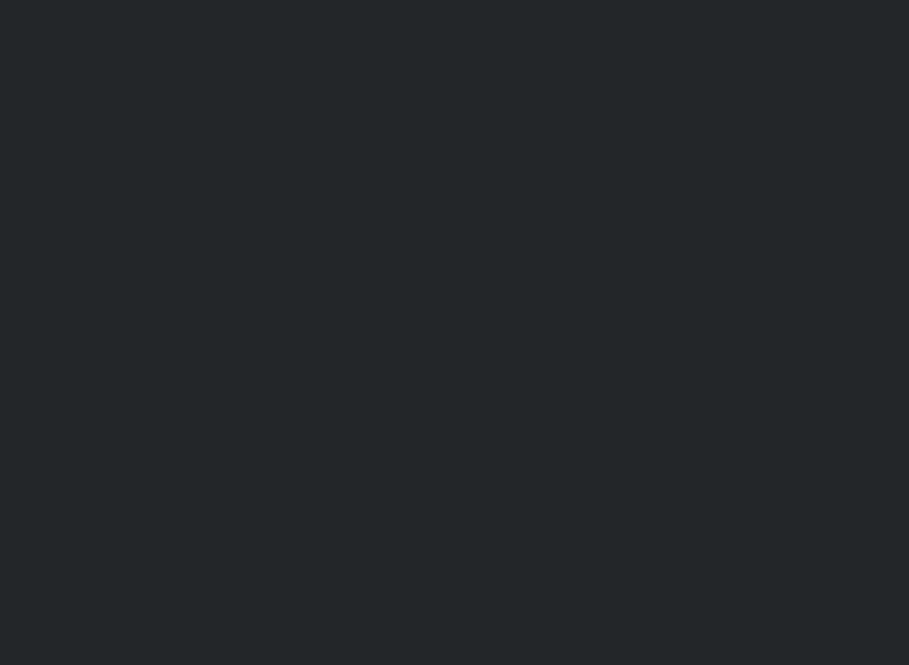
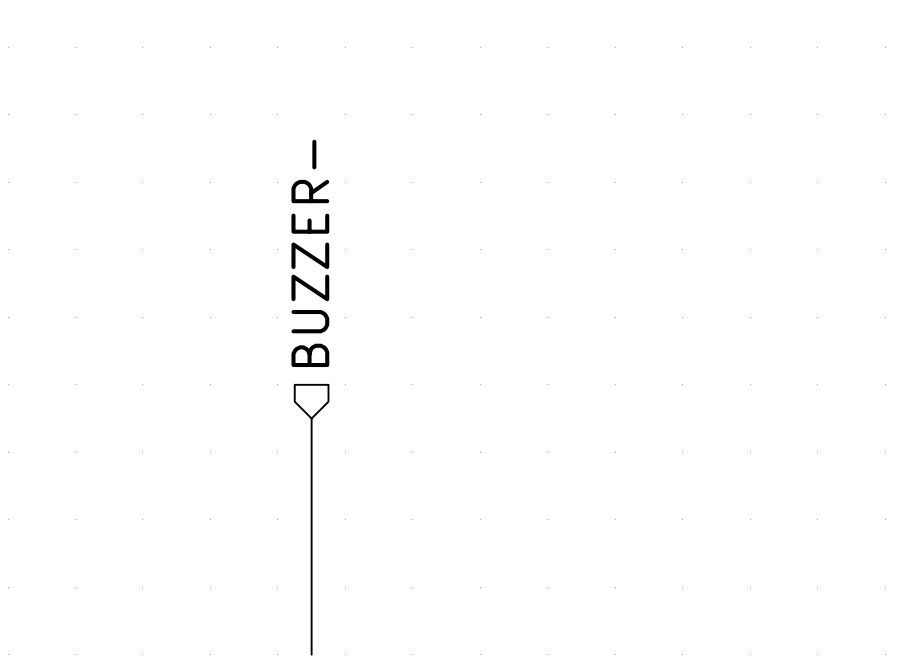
hierarchical label: none -> BUZZER- (310, 253)
wire: none -> (311, 418) (311, 654)

